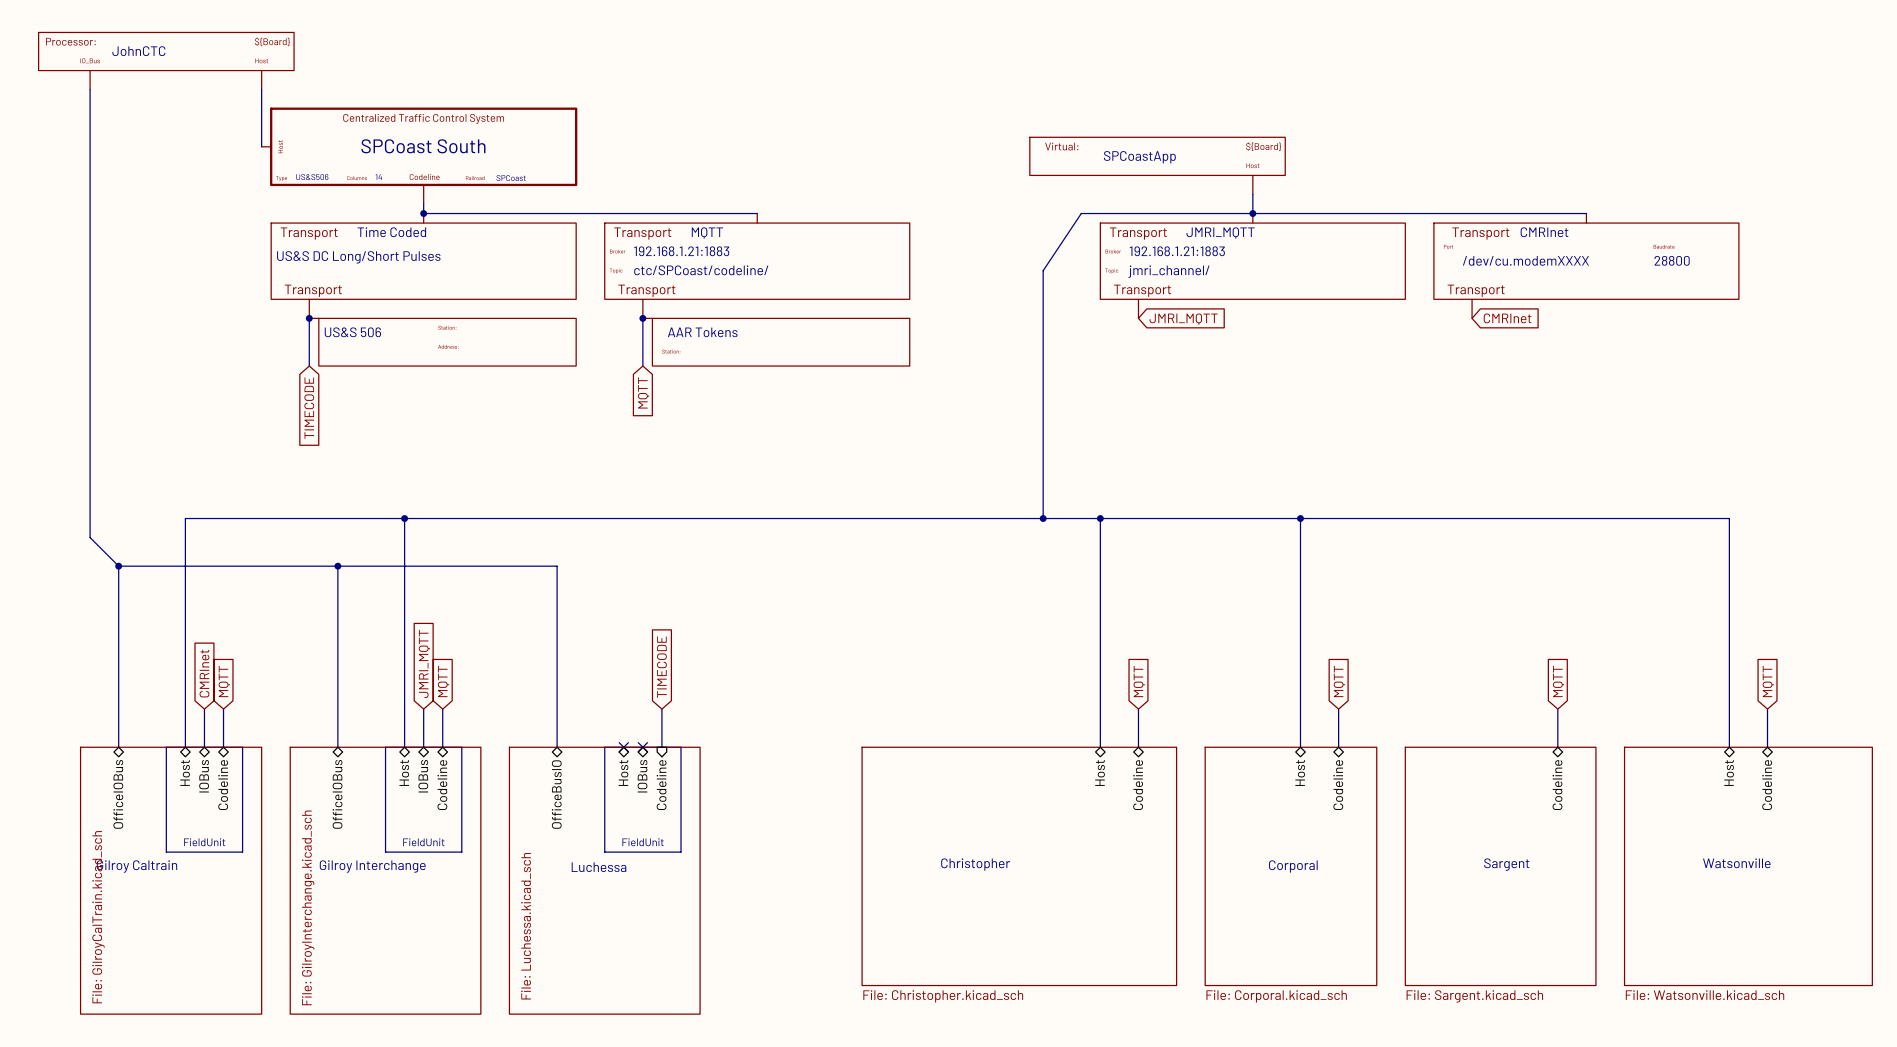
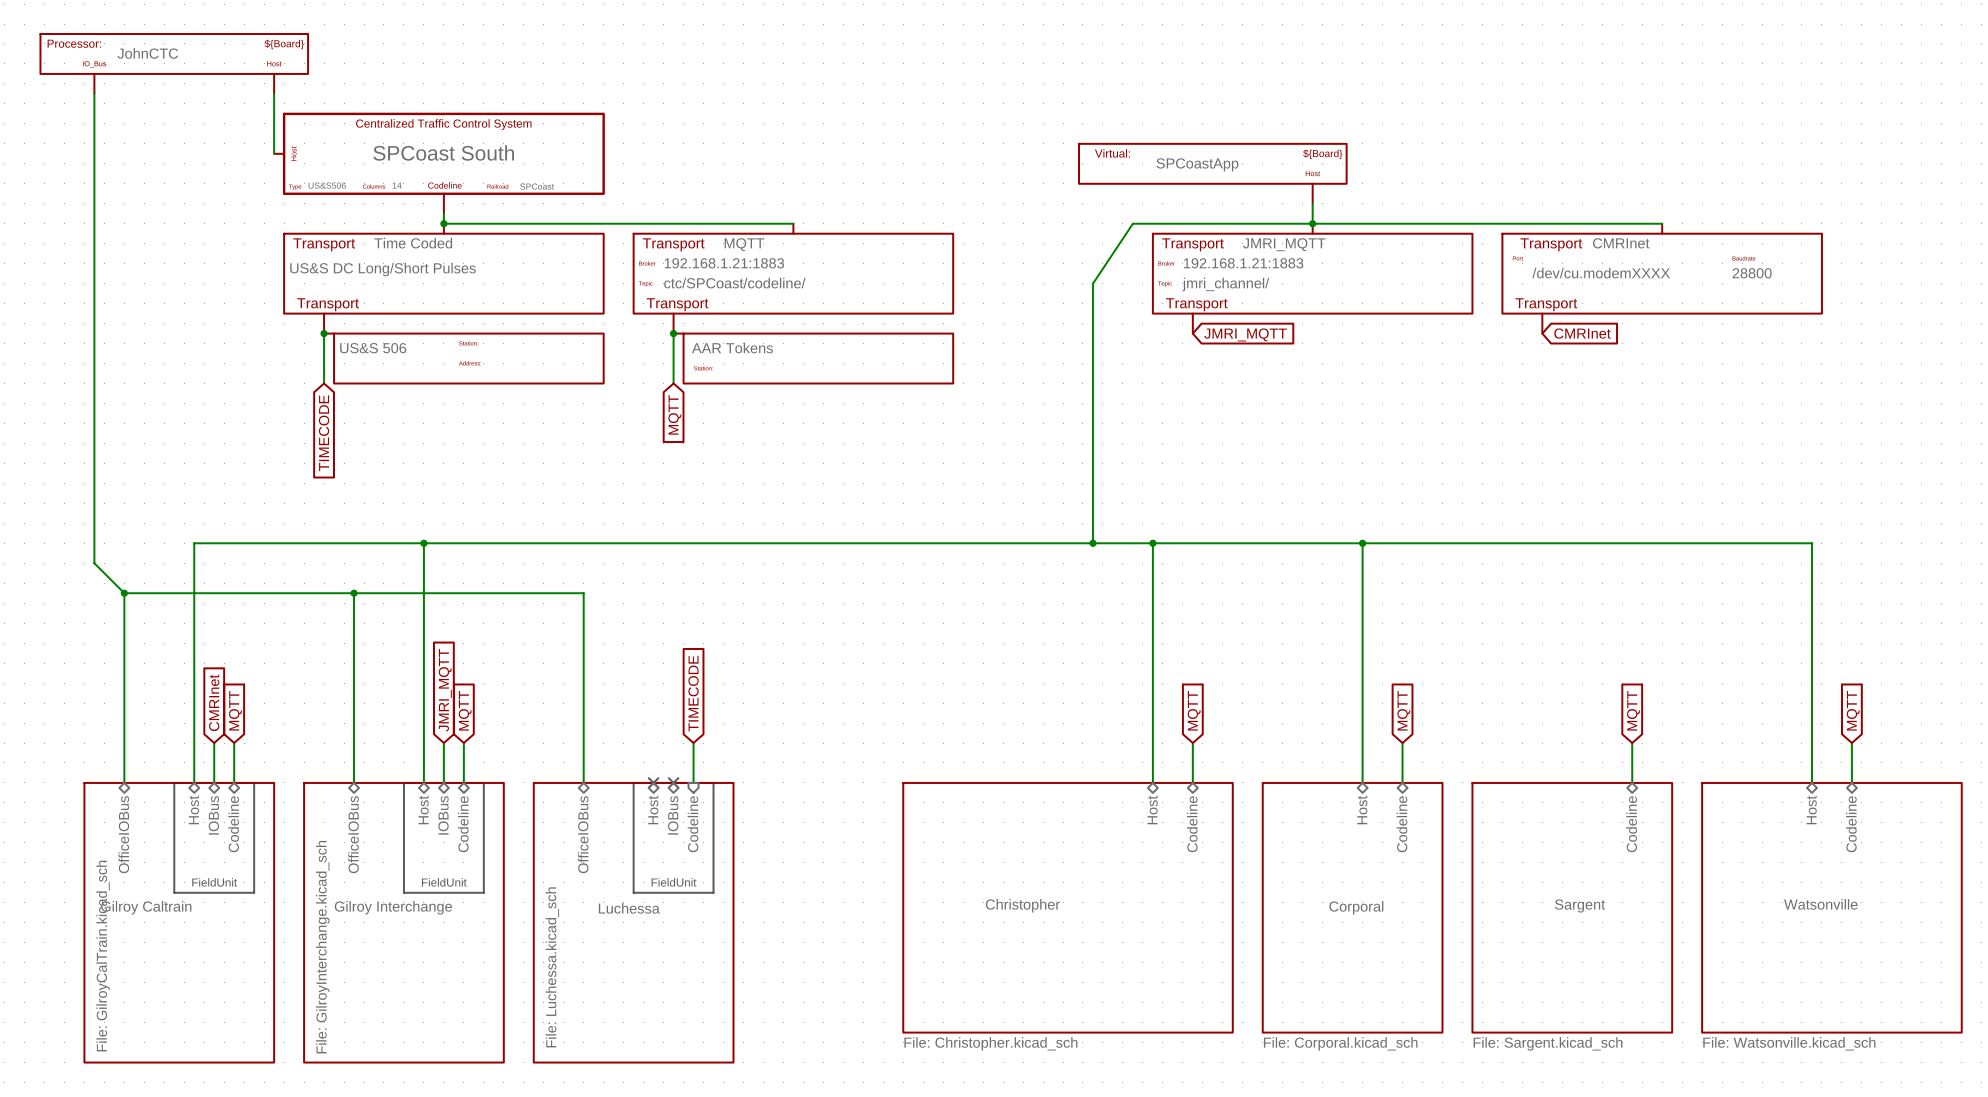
sheet pin: OfficeBusIO (556, 794) -> OfficeIOBus (583, 834)

